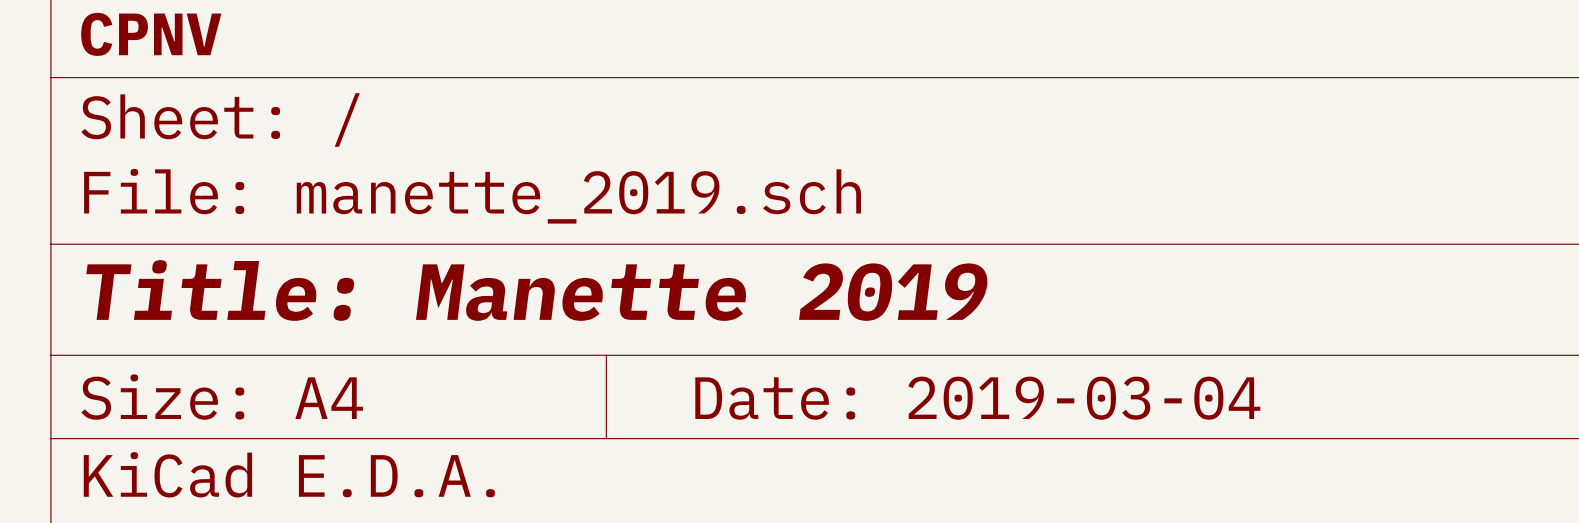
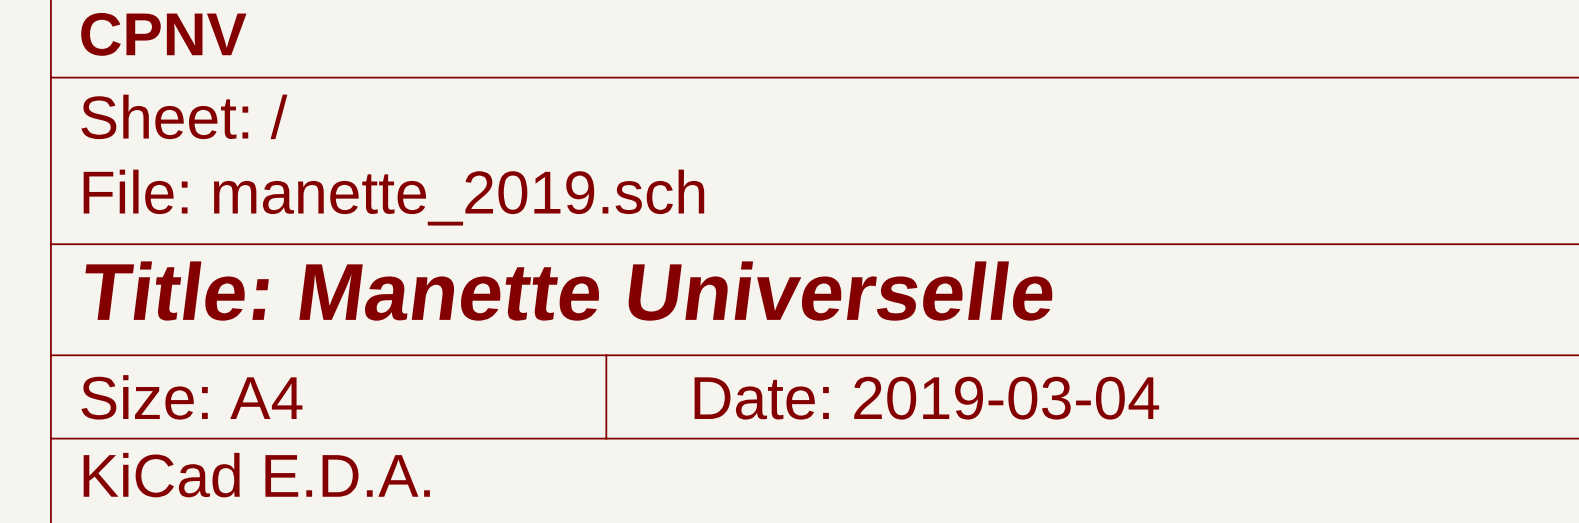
title block: Title: Manette 2019 (537, 290) -> Title: Manette Universelle (569, 291)

